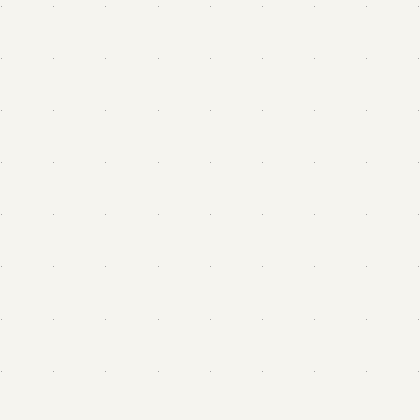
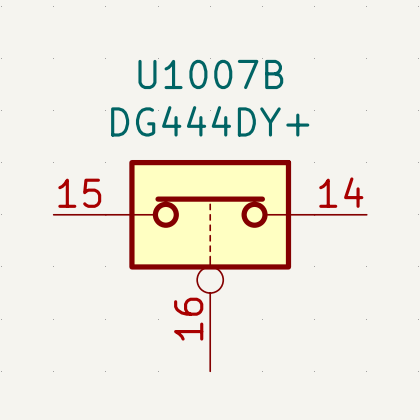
U1007B: none -> DG444DY+ (210, 265)

